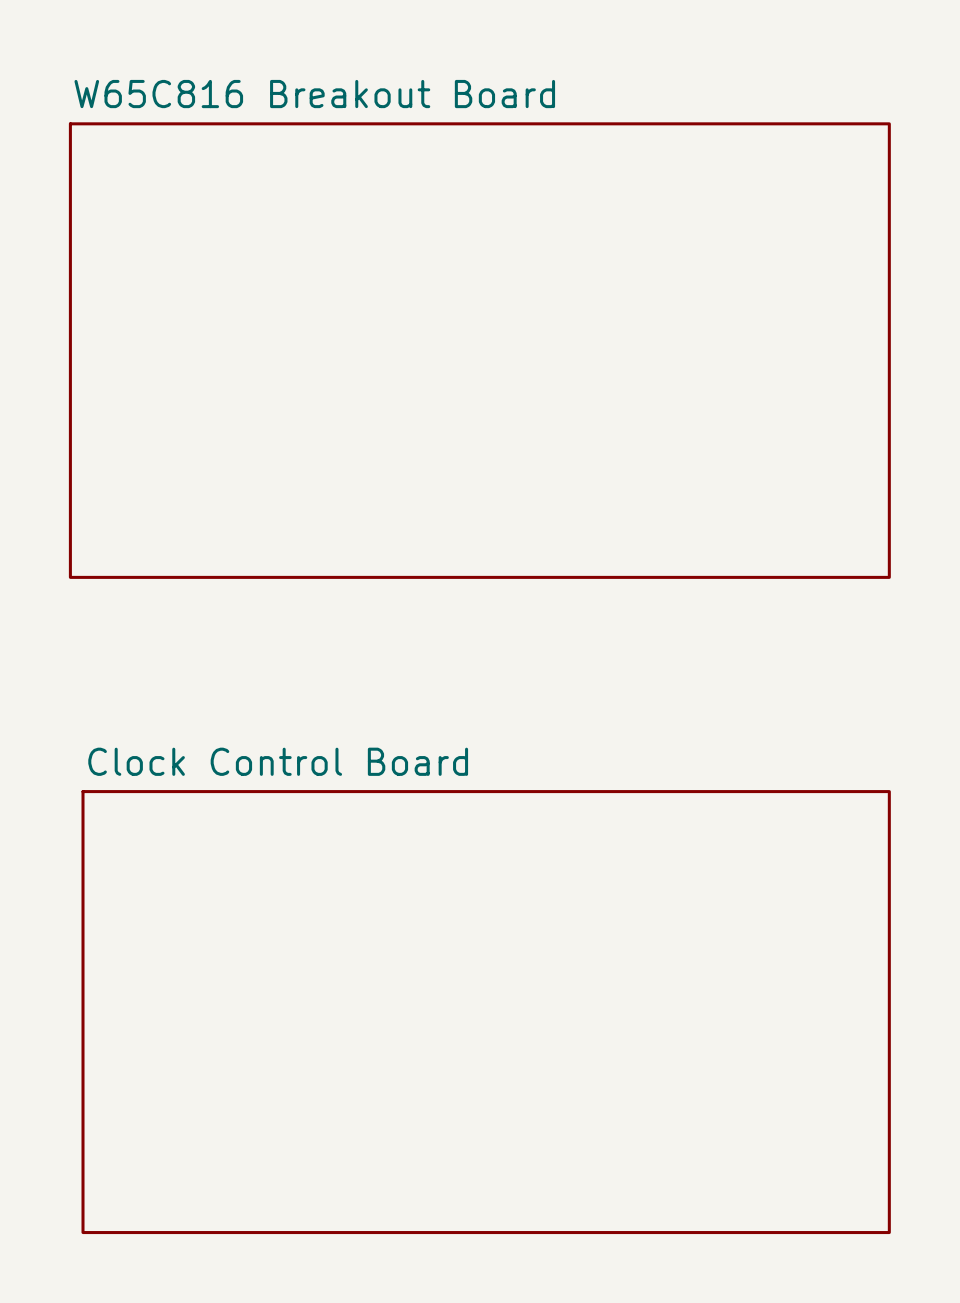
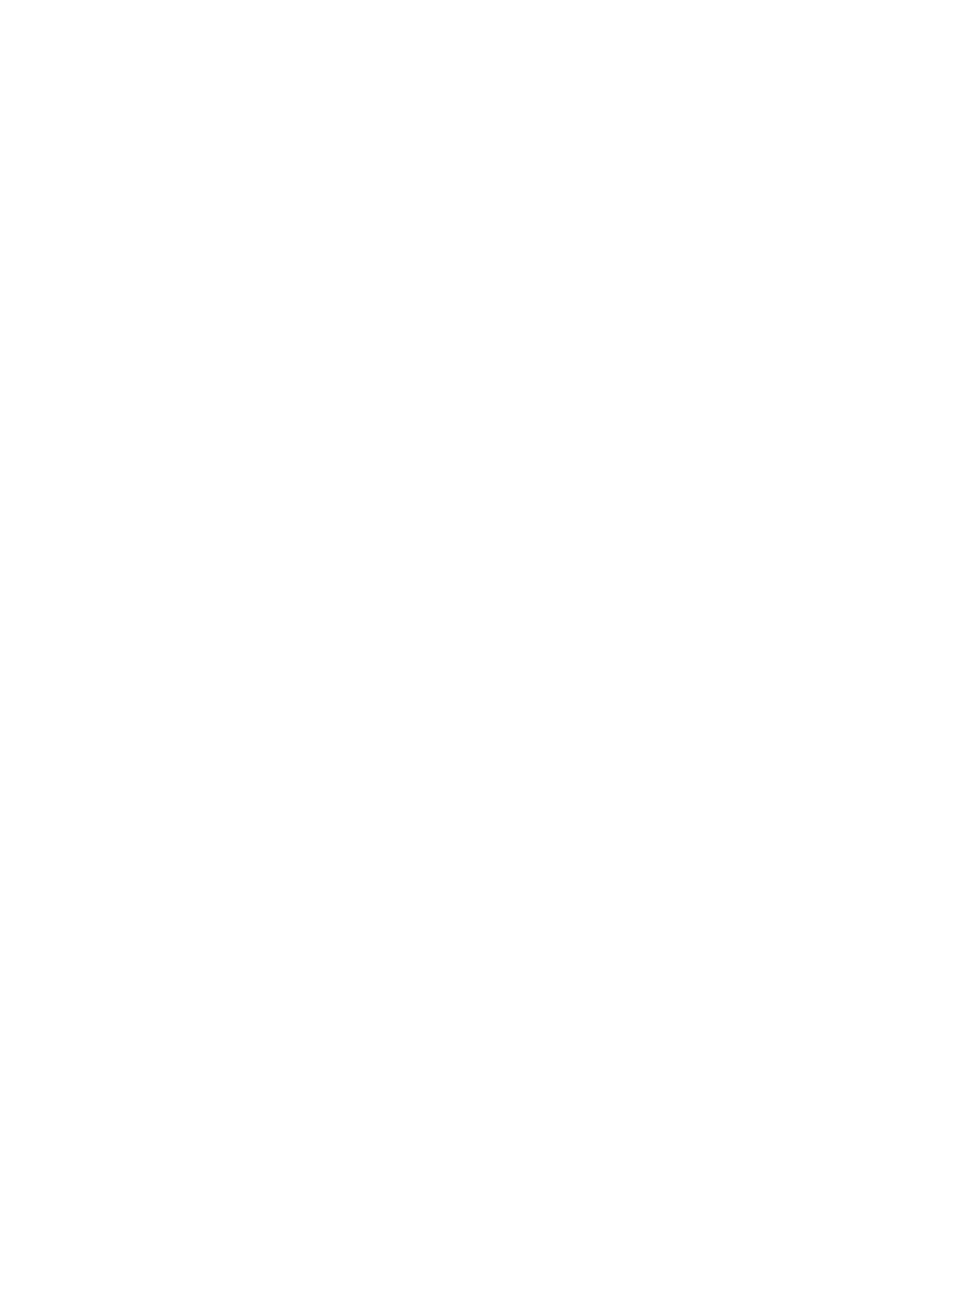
sheet W65C816 Breakout Board: (479, 350) -> none
sheet Clock Control Board: (486, 1012) -> none

